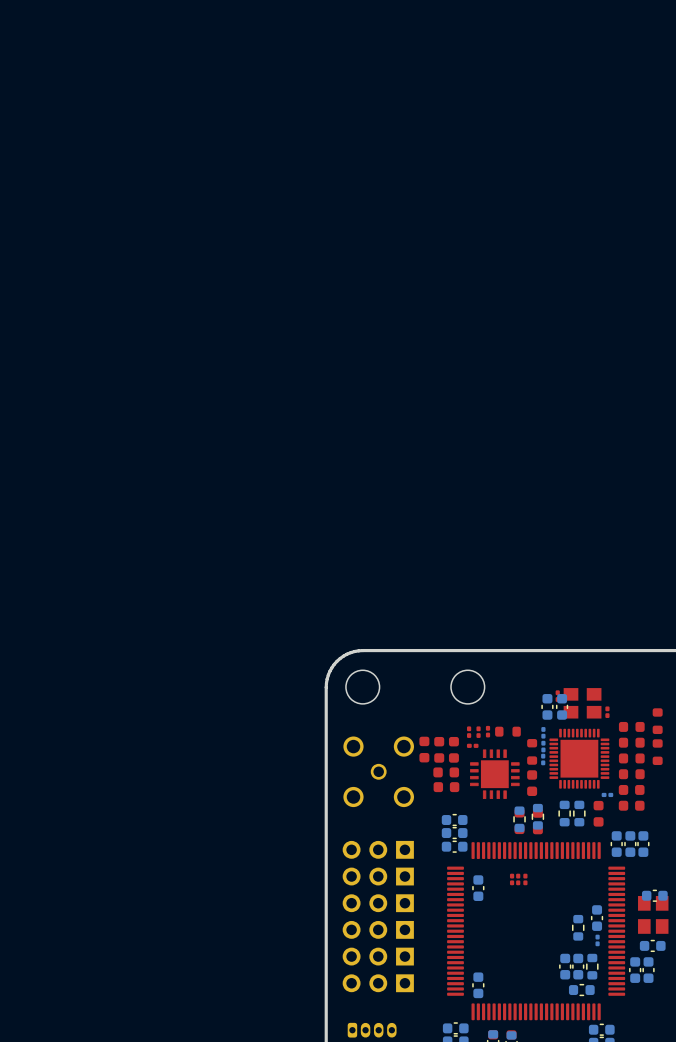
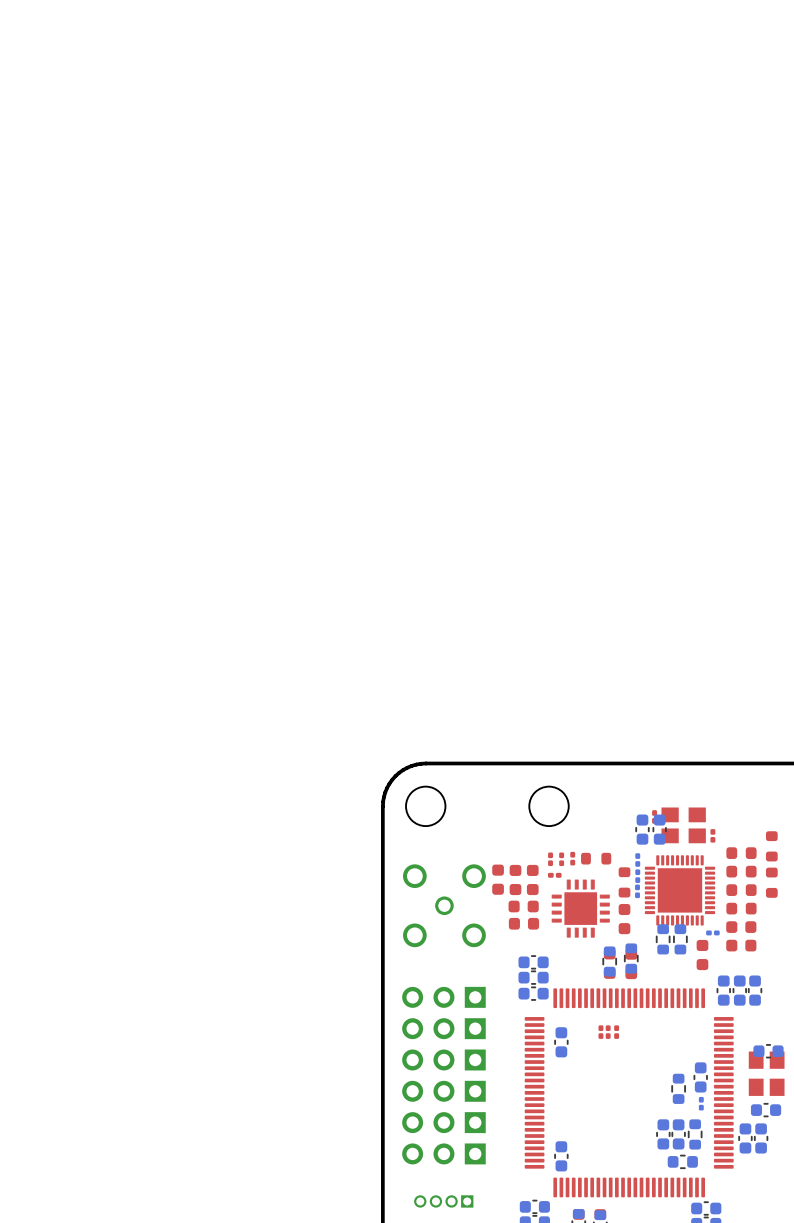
part: none -> (663, 939)
part: none -> (680, 939)
part: (564, 813) -> none
part: (579, 813) -> none
part footprint: [347, 1022, 397, 1038] -> [414, 1195, 474, 1208]

